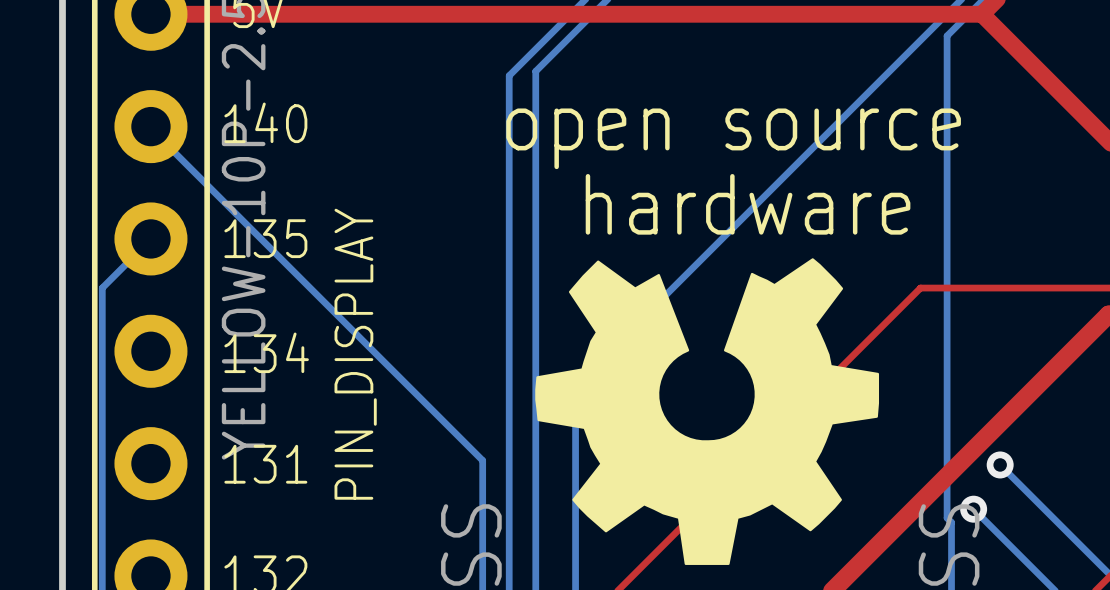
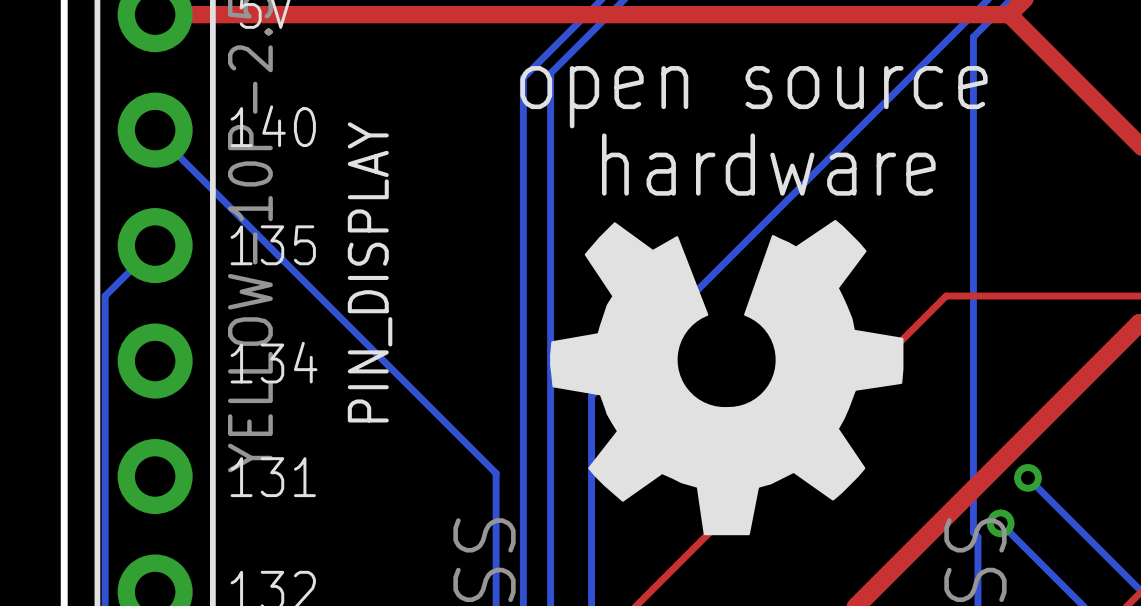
PIN_DISPLAY name position: PIN_DISPLAY (355, 354) -> PIN_DISPLAY (370, 272)
drawing position: (707, 411) -> (726, 377)

